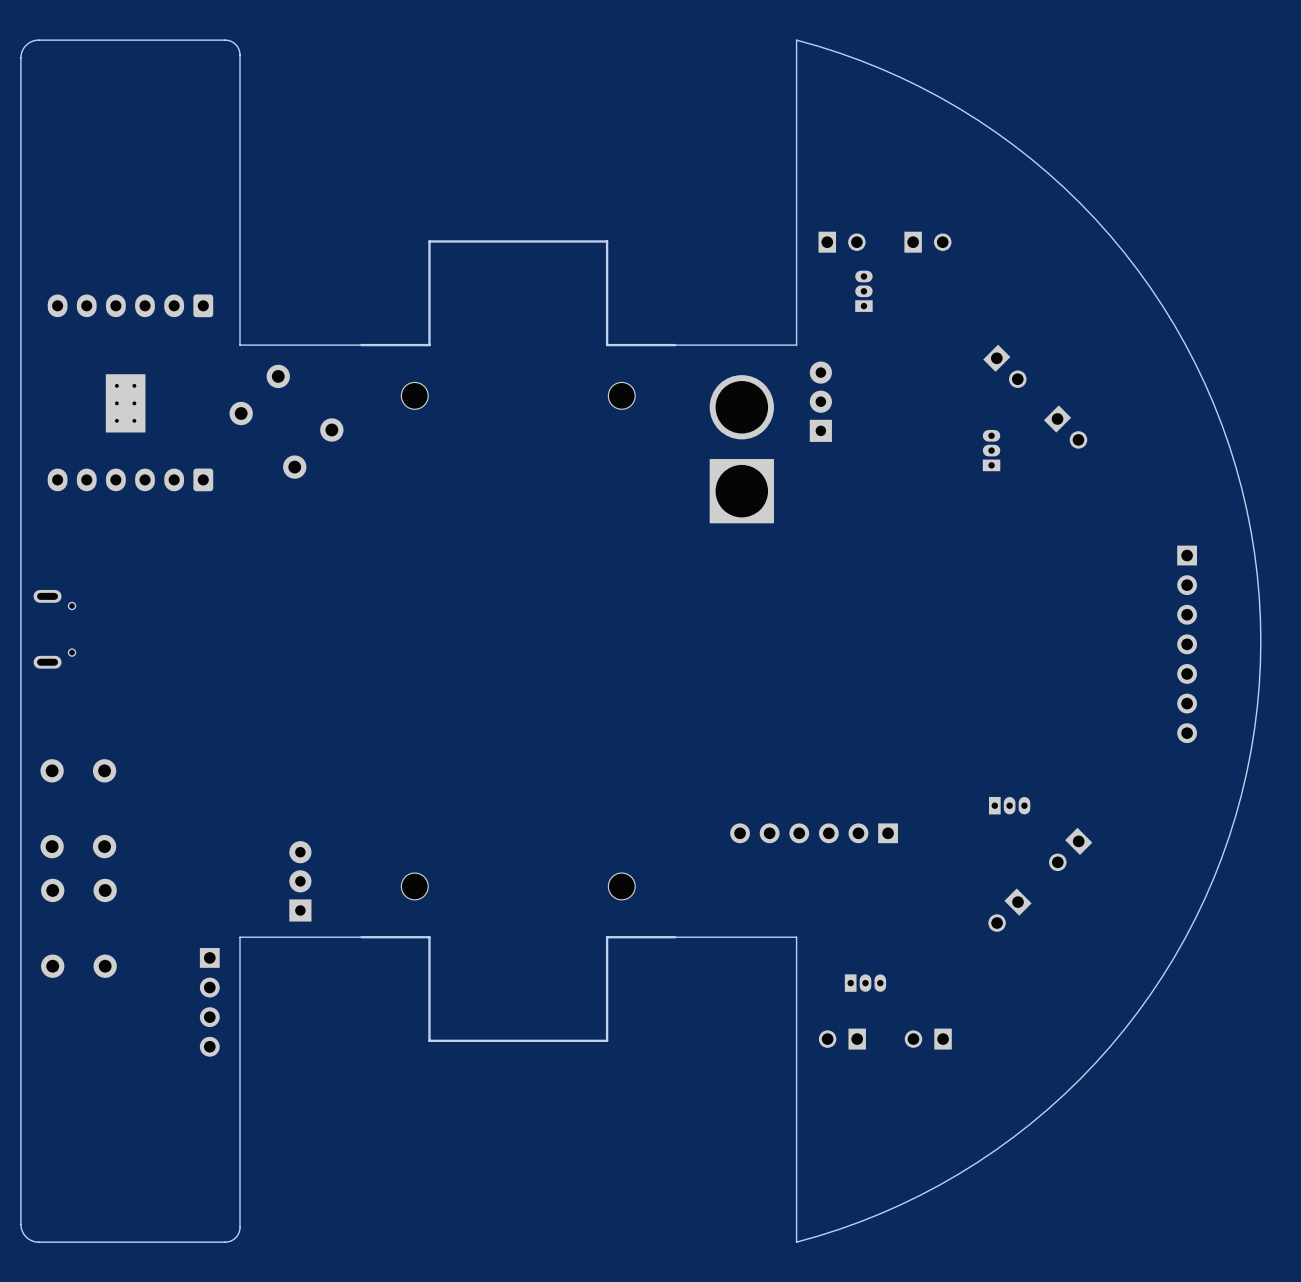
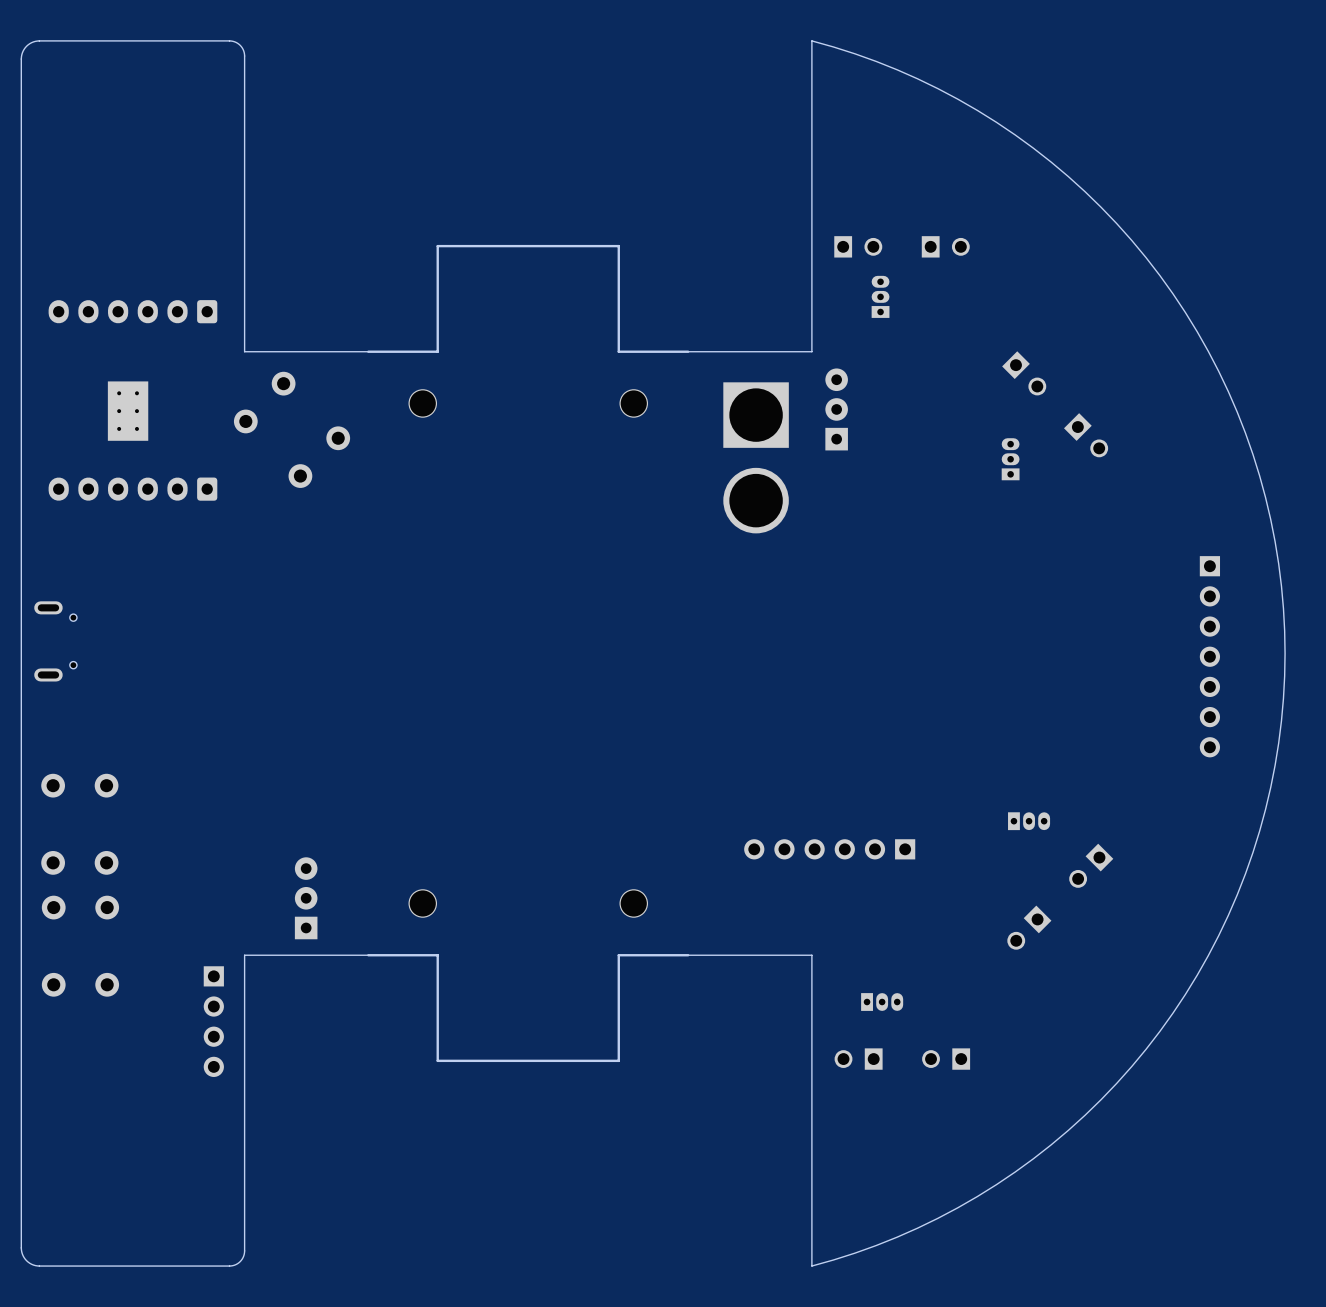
part rotation: 0° (741, 449) -> 180° (756, 457)

